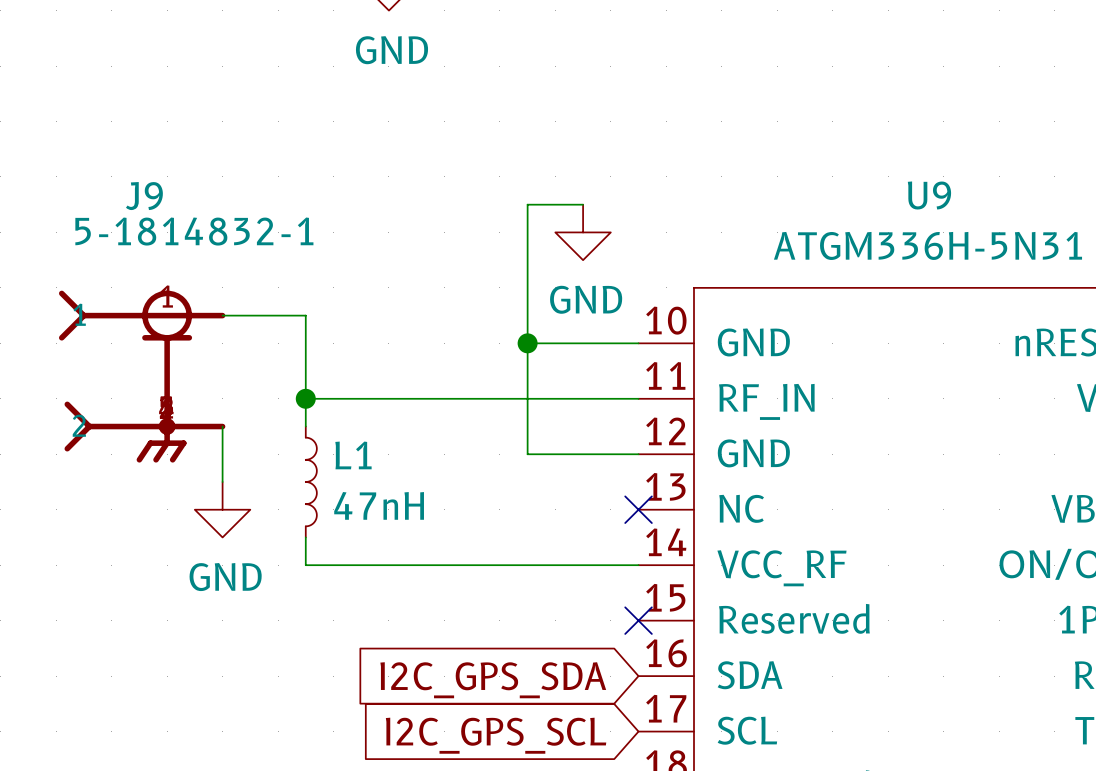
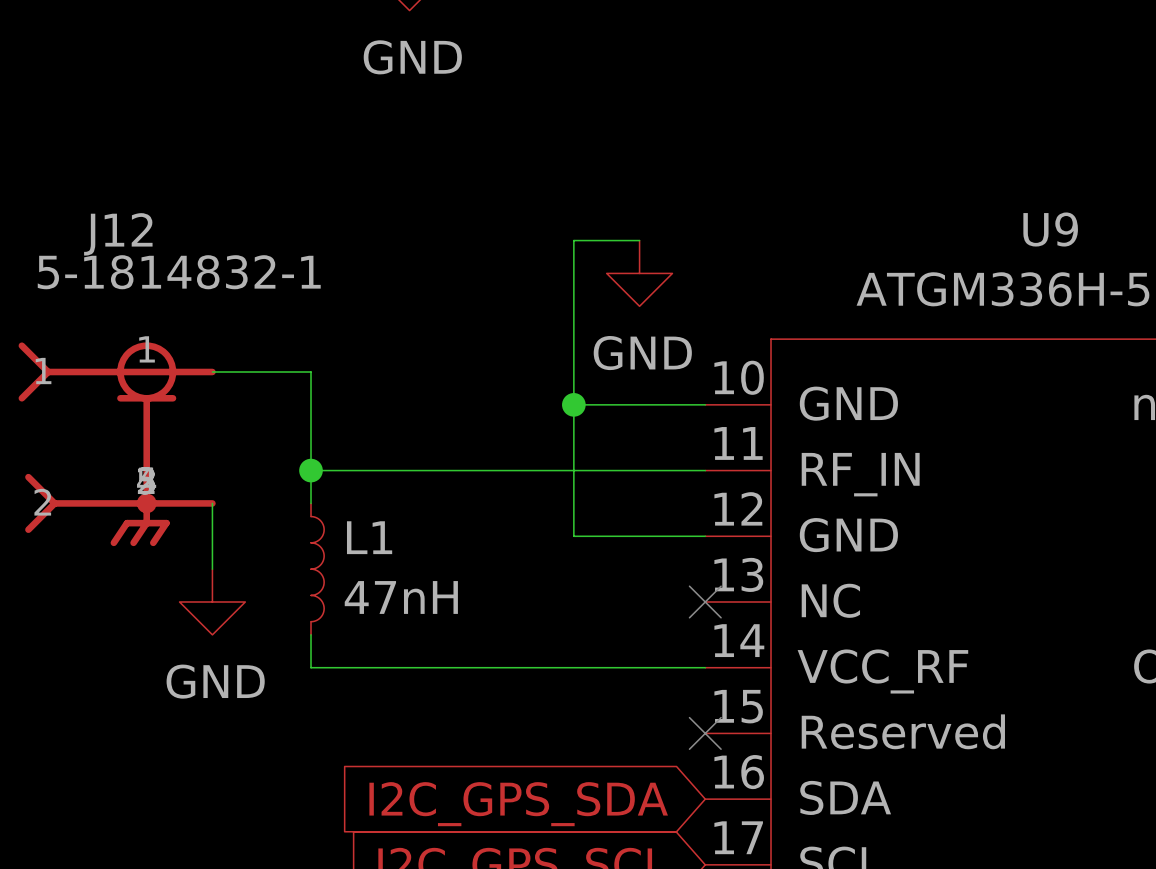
J9 name: J9 (144, 196) -> J12 (118, 234)

